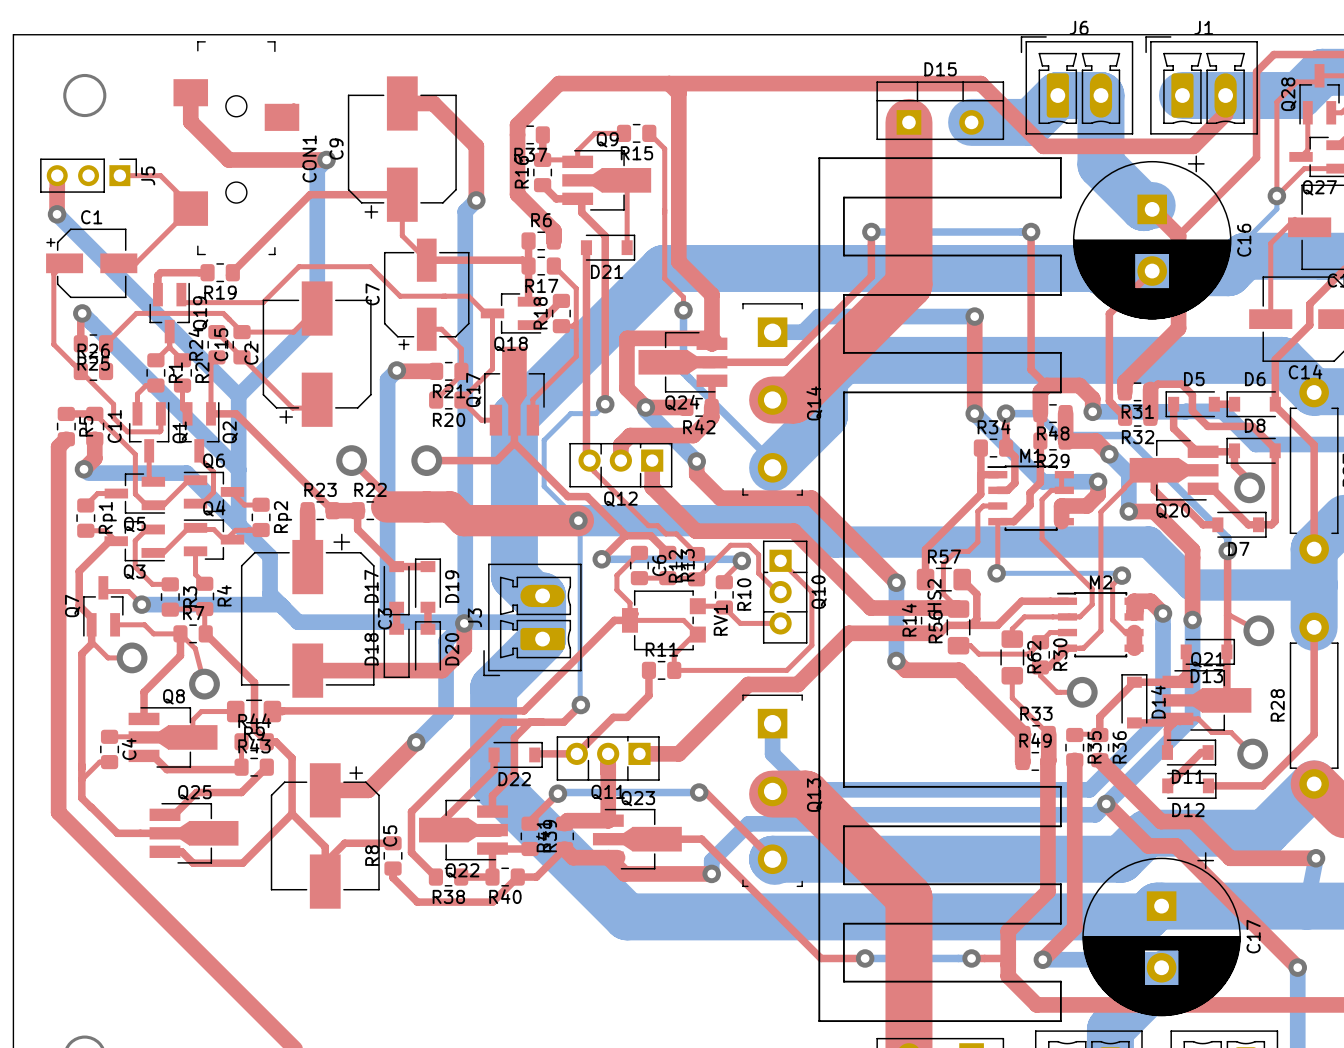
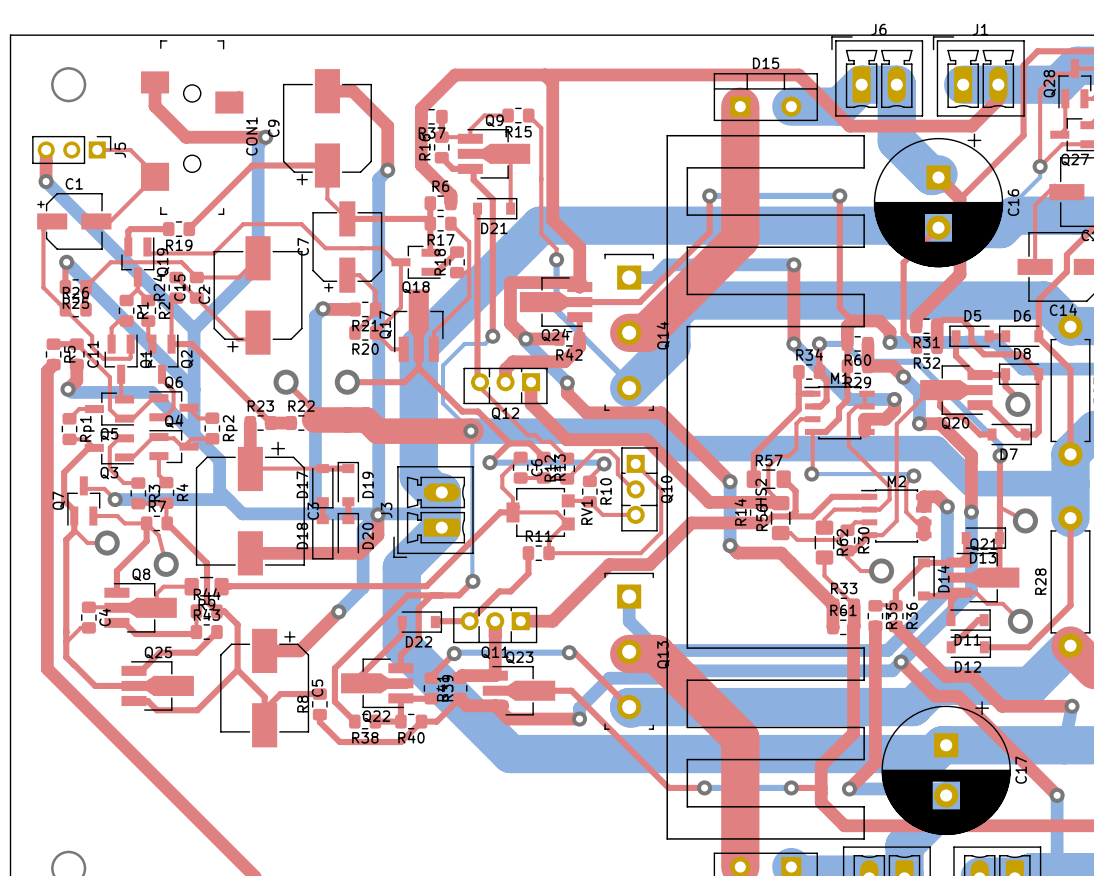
R48 name: R48 (1053, 433) -> R60 (857, 360)
top track: (357, 510) (357, 529) (394, 566) -> none
top track: none -> (320, 468) (250, 468)
R49 name: R49 (1035, 740) -> R61 (843, 610)

